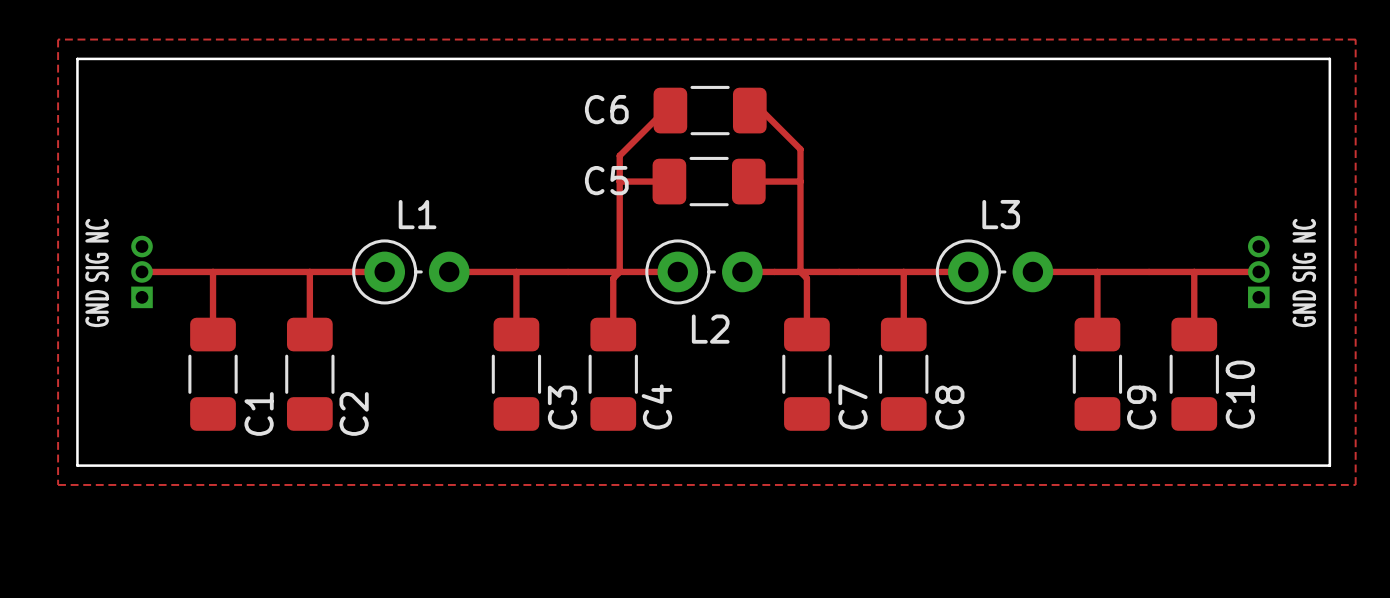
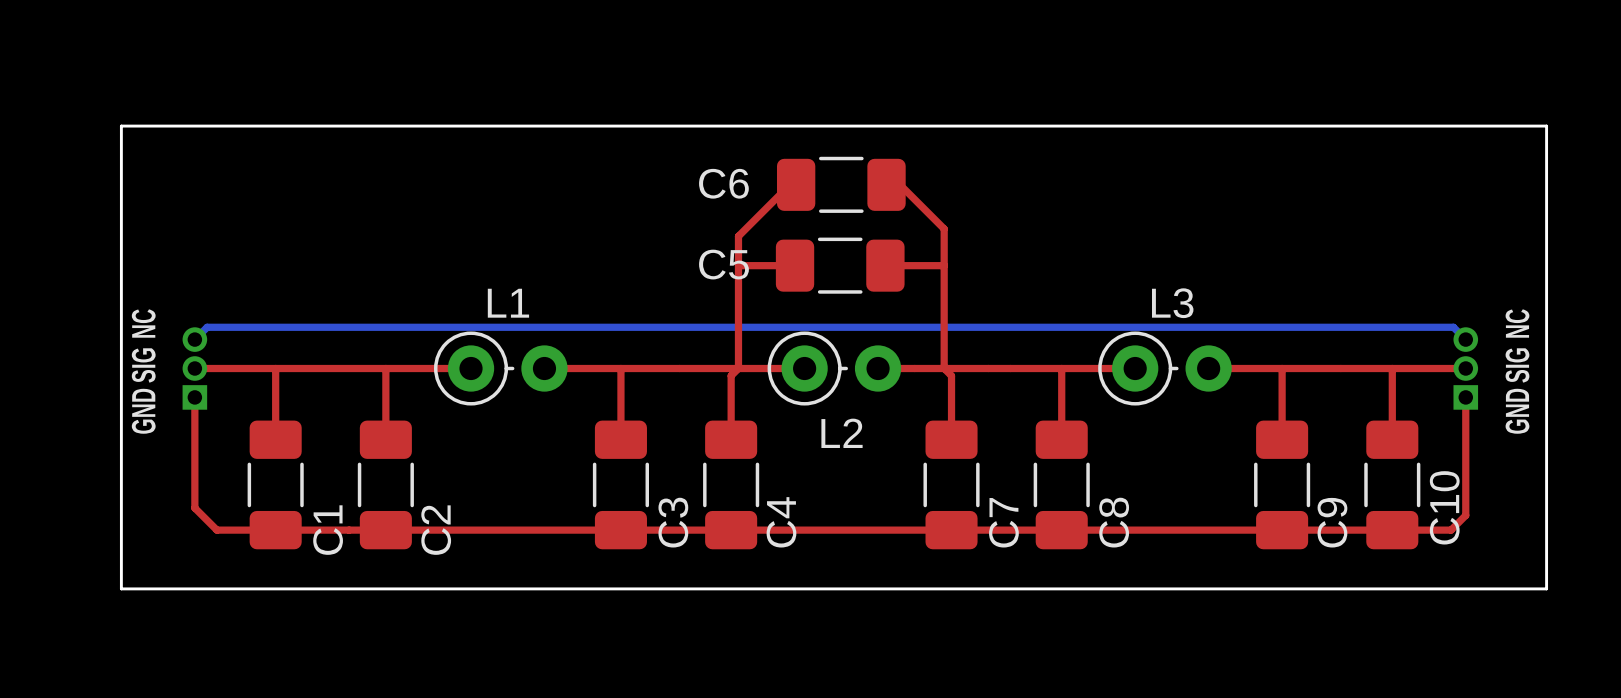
top zone outline: (58, 39) (1355, 39) (1355, 484) (58, 484) (58, 39) -> none
bottom track: none -> (194, 339) (207, 327) (1453, 327) (1465, 339)
top track: none -> (194, 397) (194, 508) (216, 530) (1451, 530) (1465, 515) (1465, 397)

